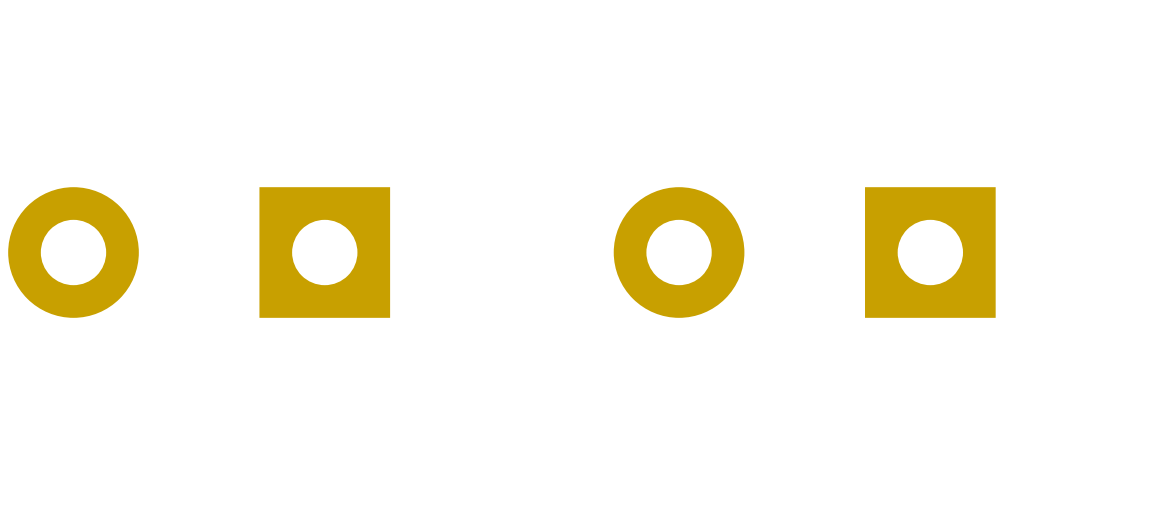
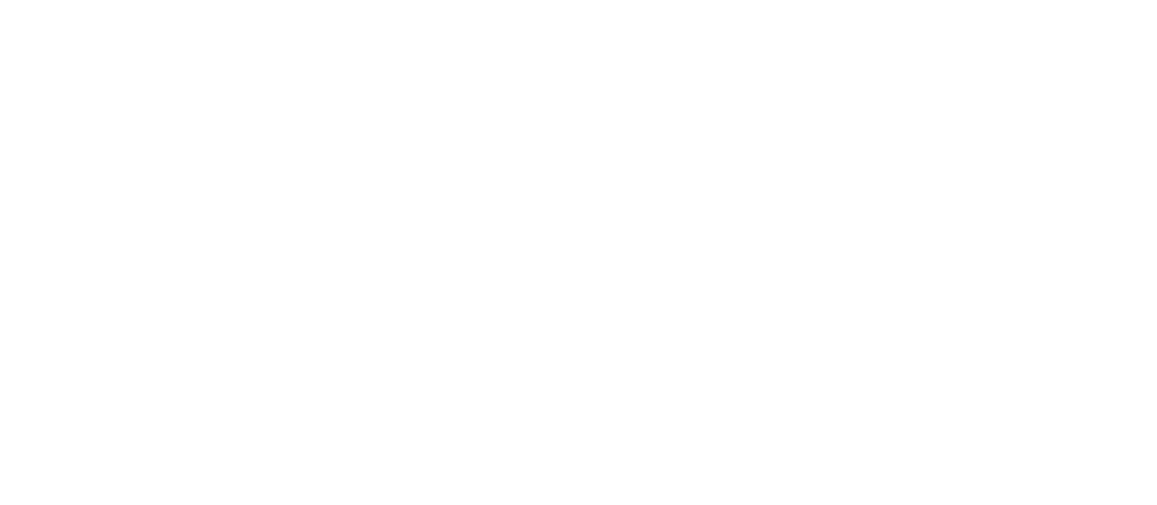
part: (199, 252) -> none
part: (804, 252) -> none

